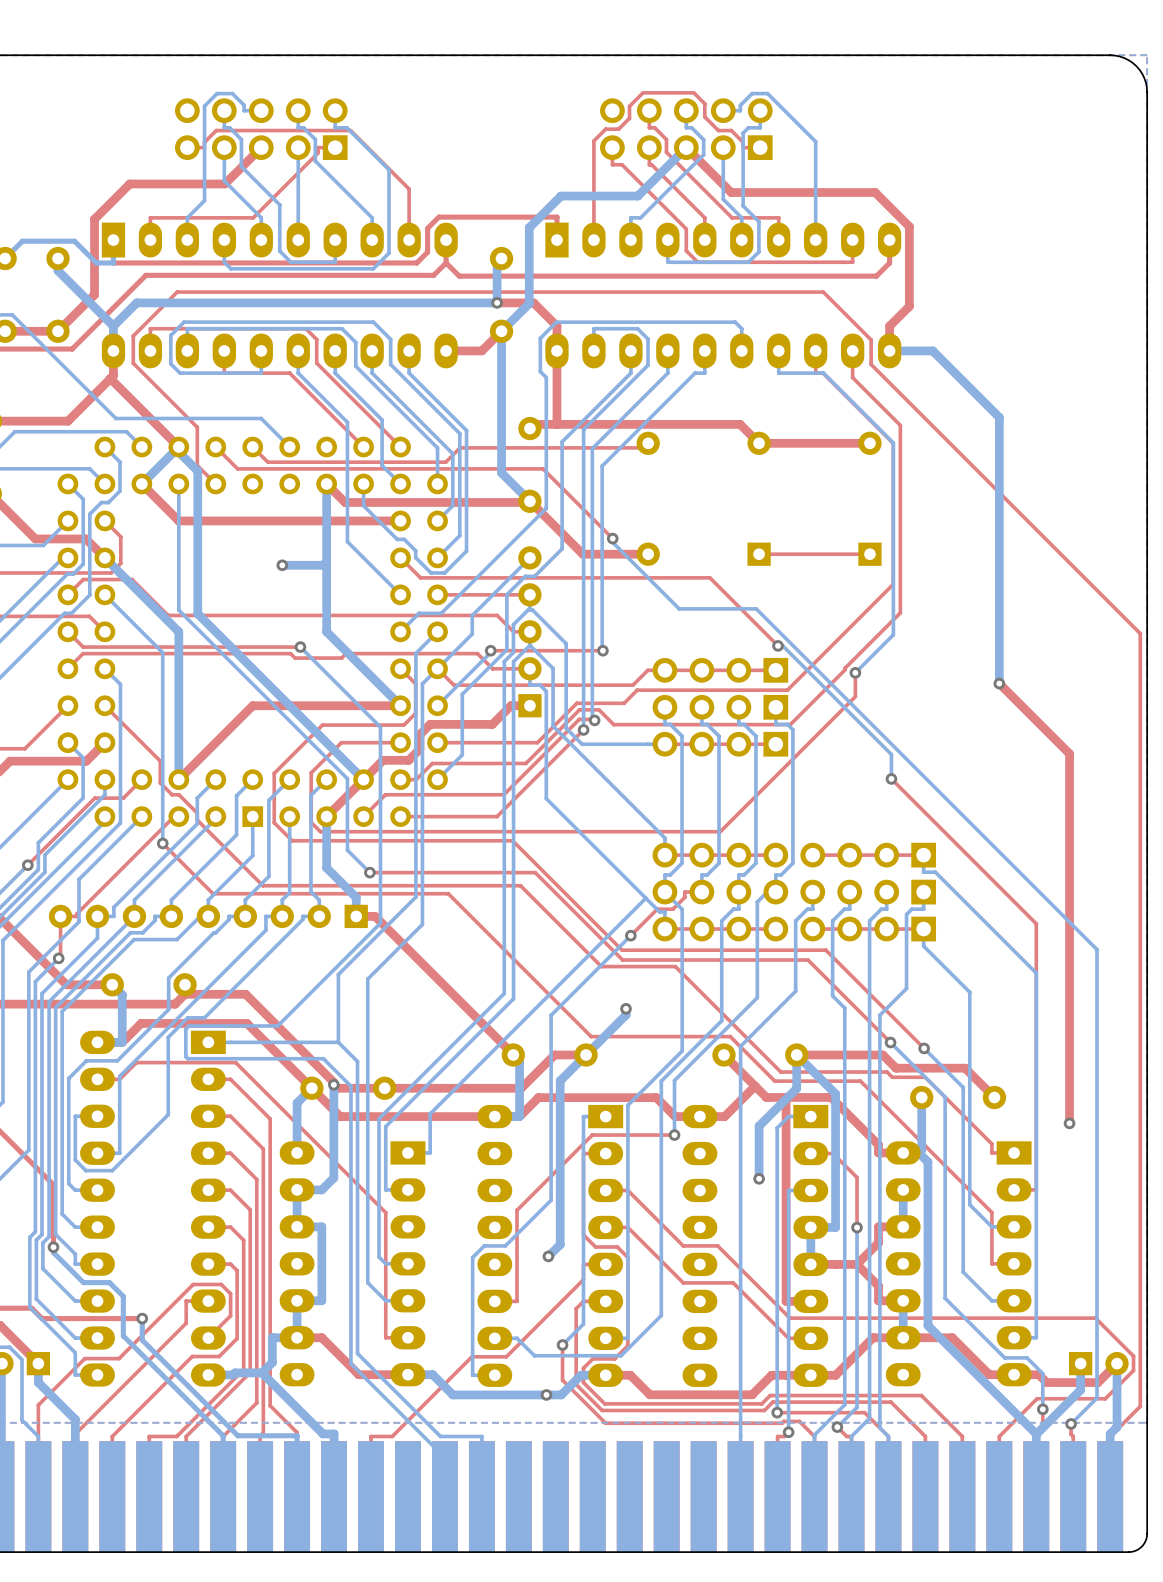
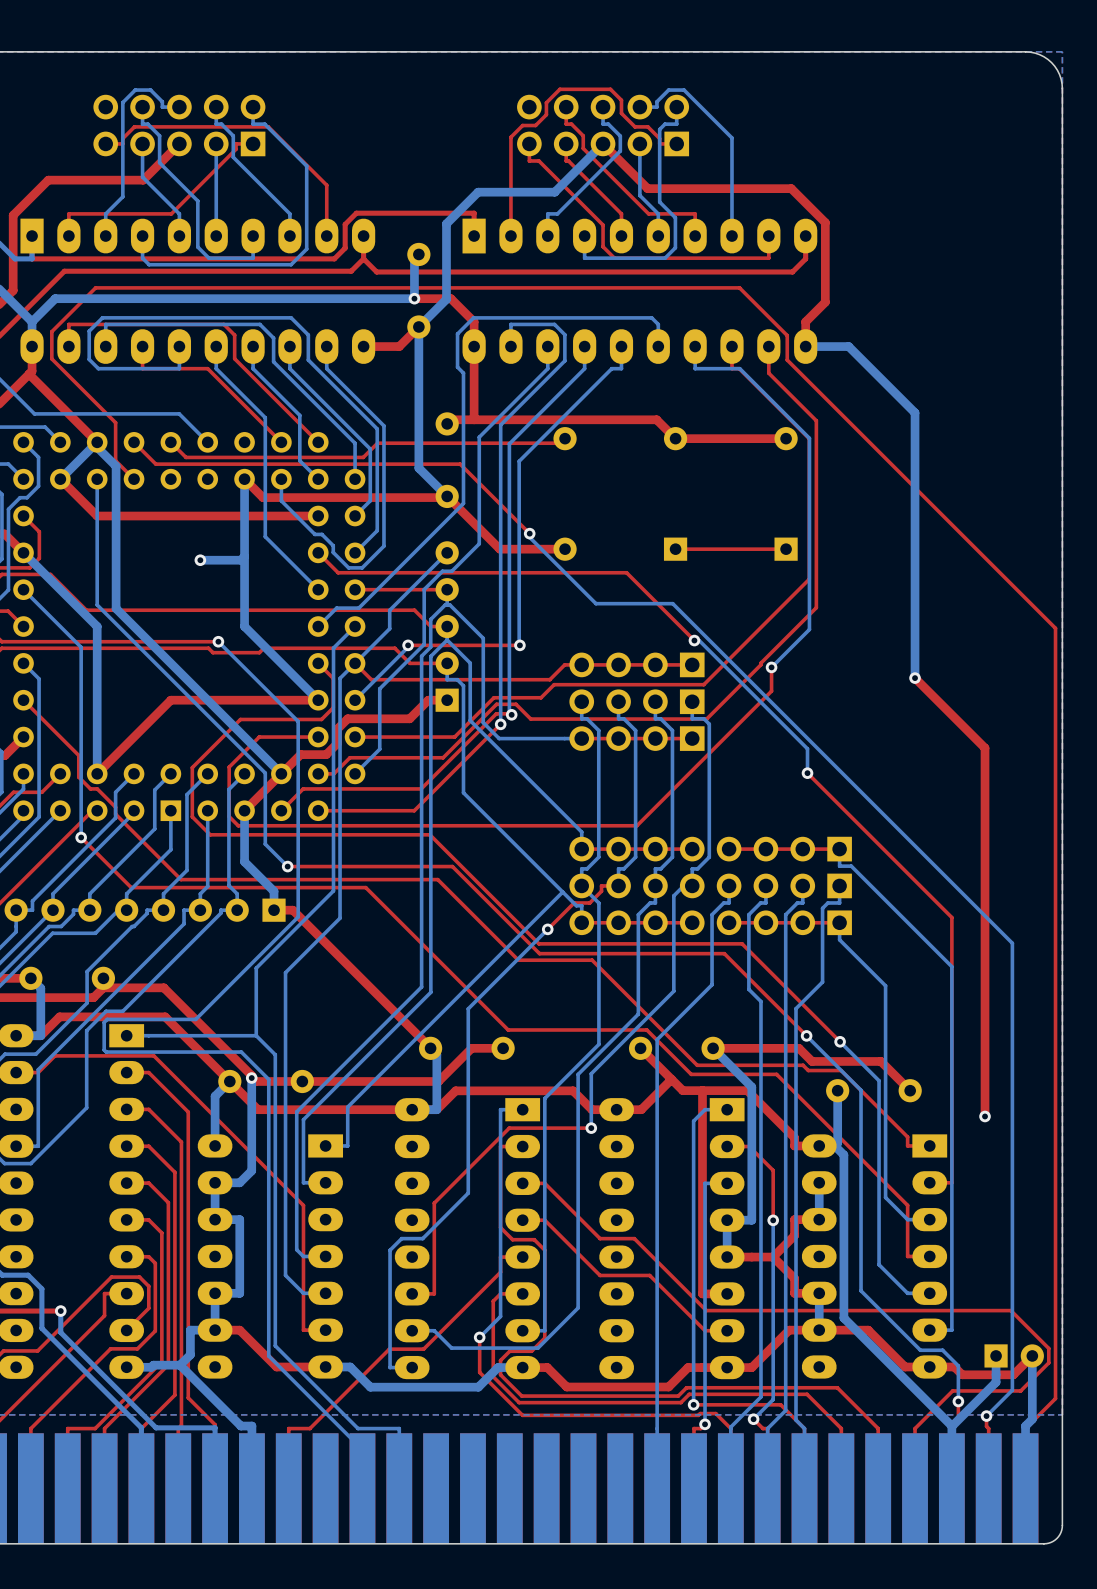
bottom track: (626, 1008) (626, 1015) (560, 1080) (560, 1244) (548, 1256) -> none
via: (626, 1008) -> none
bottom track: (796, 1055) (796, 1088) (759, 1126) (759, 1178) -> none
via: (759, 1178) -> none
via: (548, 1256) -> none
via: (546, 1394) -> none

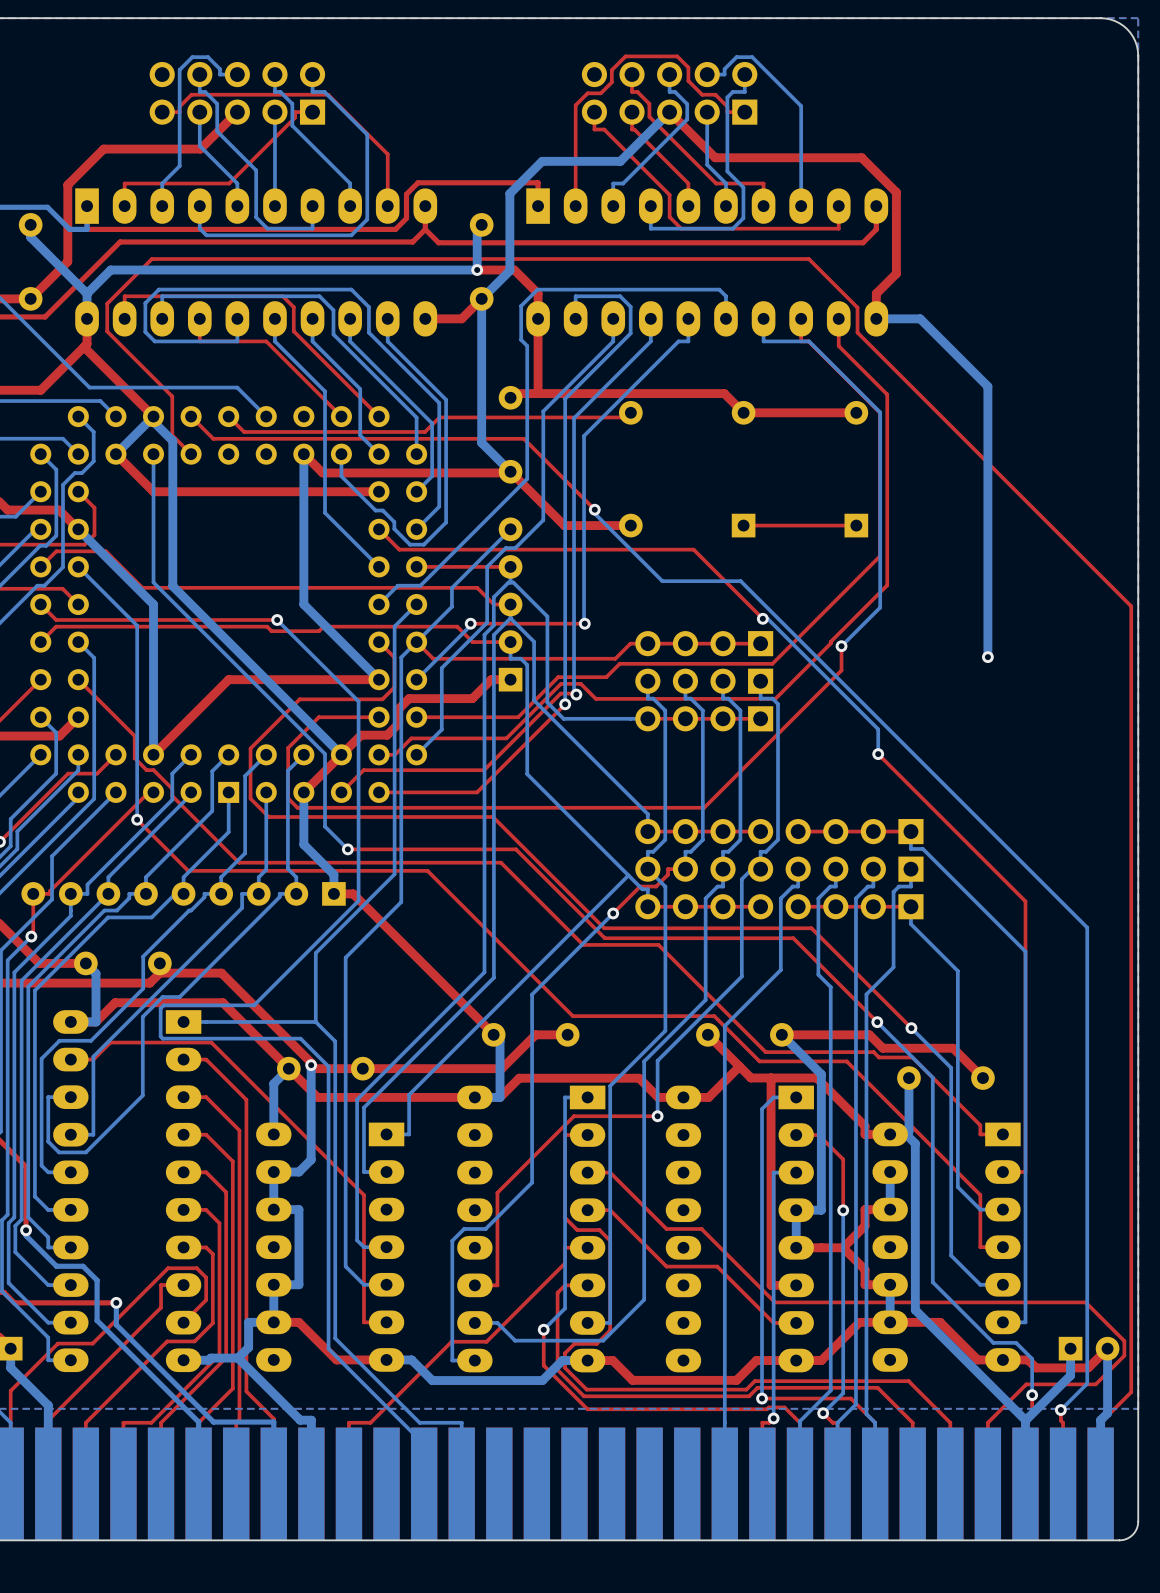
bottom track: (244, 556) (240, 560) (200, 560) -> none
via: (200, 560) -> none
top track: (915, 678) (985, 748) (985, 1116) -> none
via: (985, 1116) -> none

